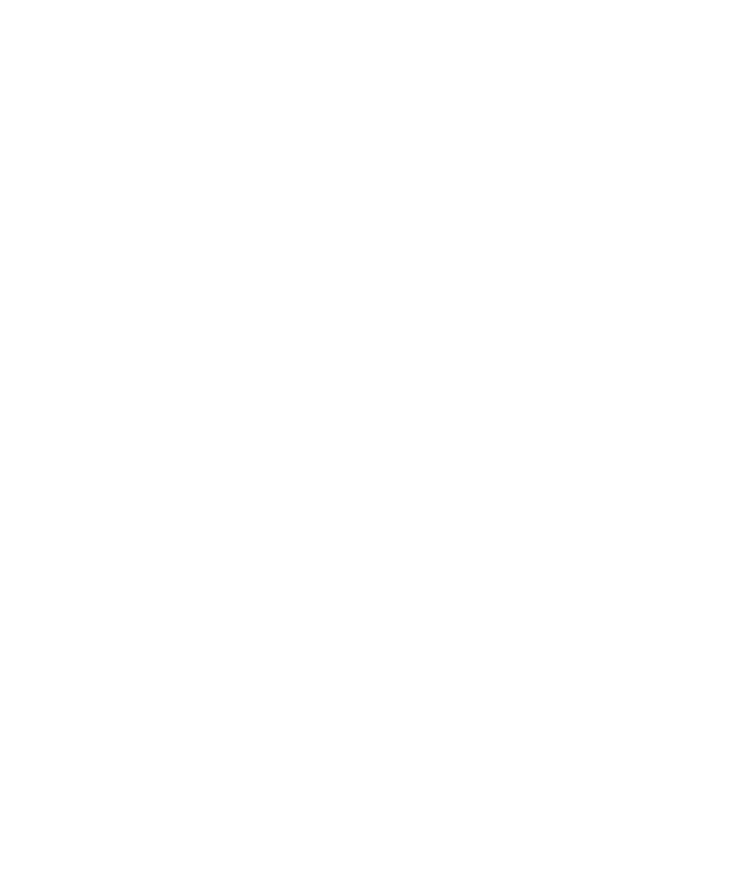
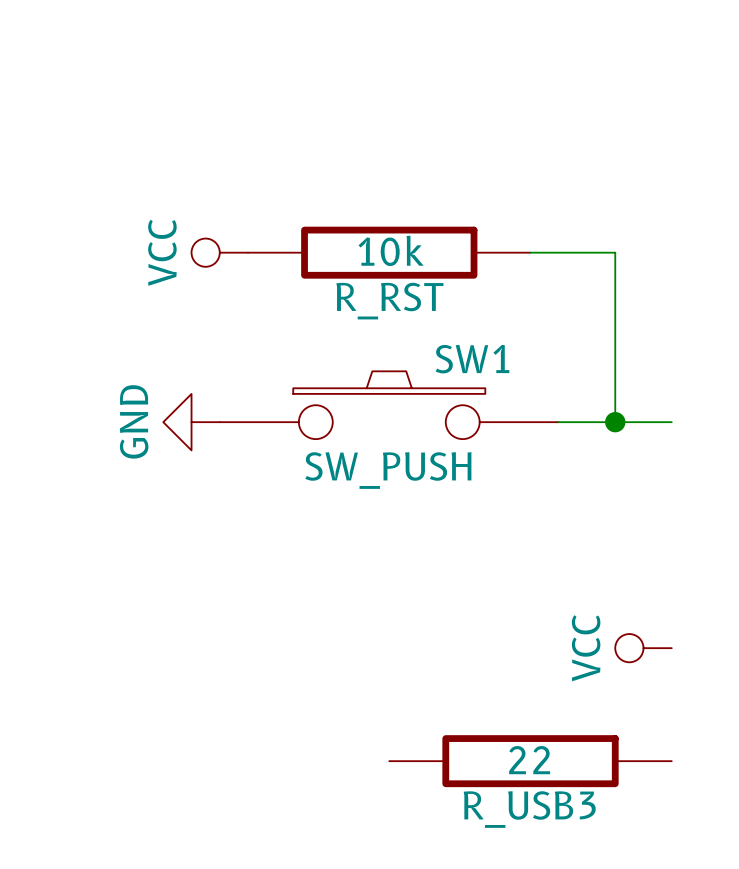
power symbol: none -> VCC (219, 252)
R_RST: none -> 10k (389, 252)
wire: none -> (530, 252) (615, 252) (615, 422)
SW1: none -> SW_PUSH (389, 405)
power symbol: none -> GND (191, 422)
wire: none -> (558, 422) (671, 422)
junction: none -> (615, 422)
power symbol: none -> VCC (643, 648)
R_USB3: none -> 22 (530, 761)

